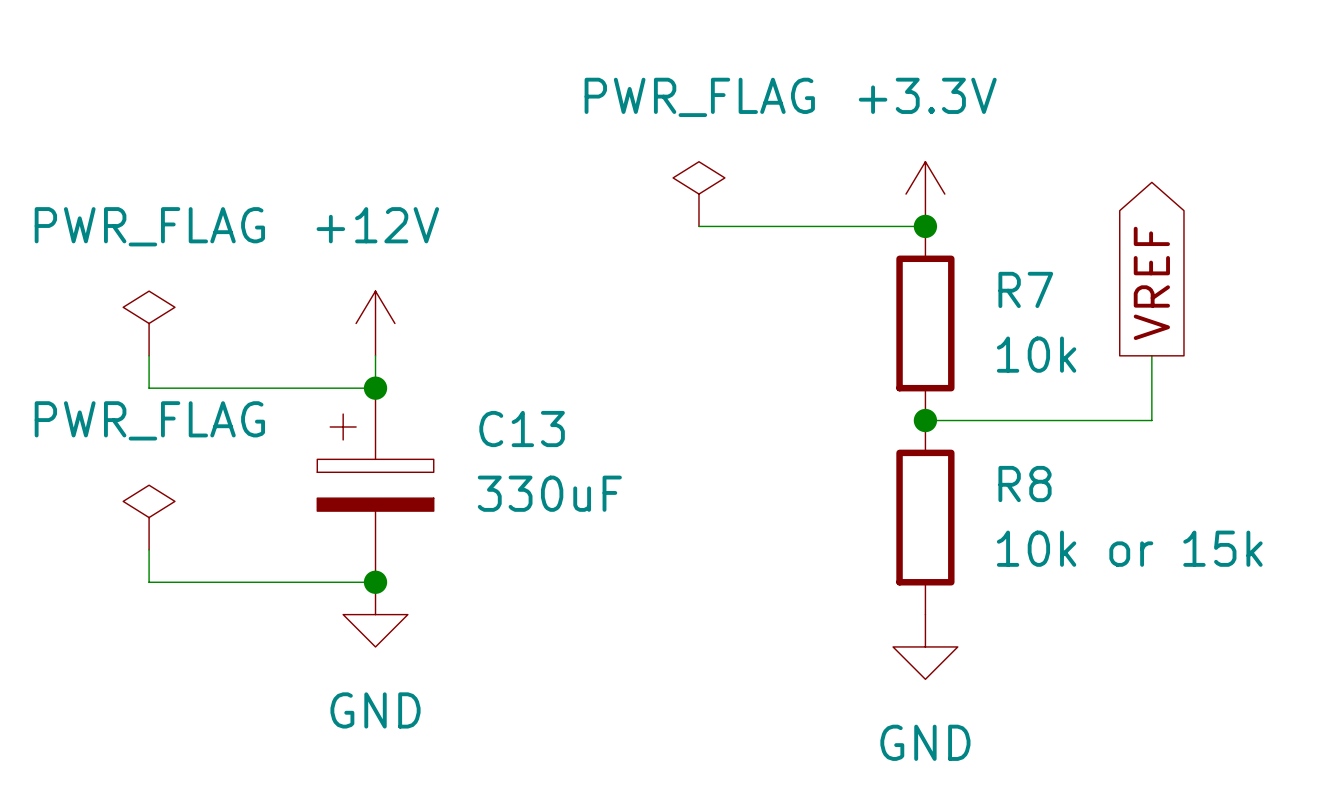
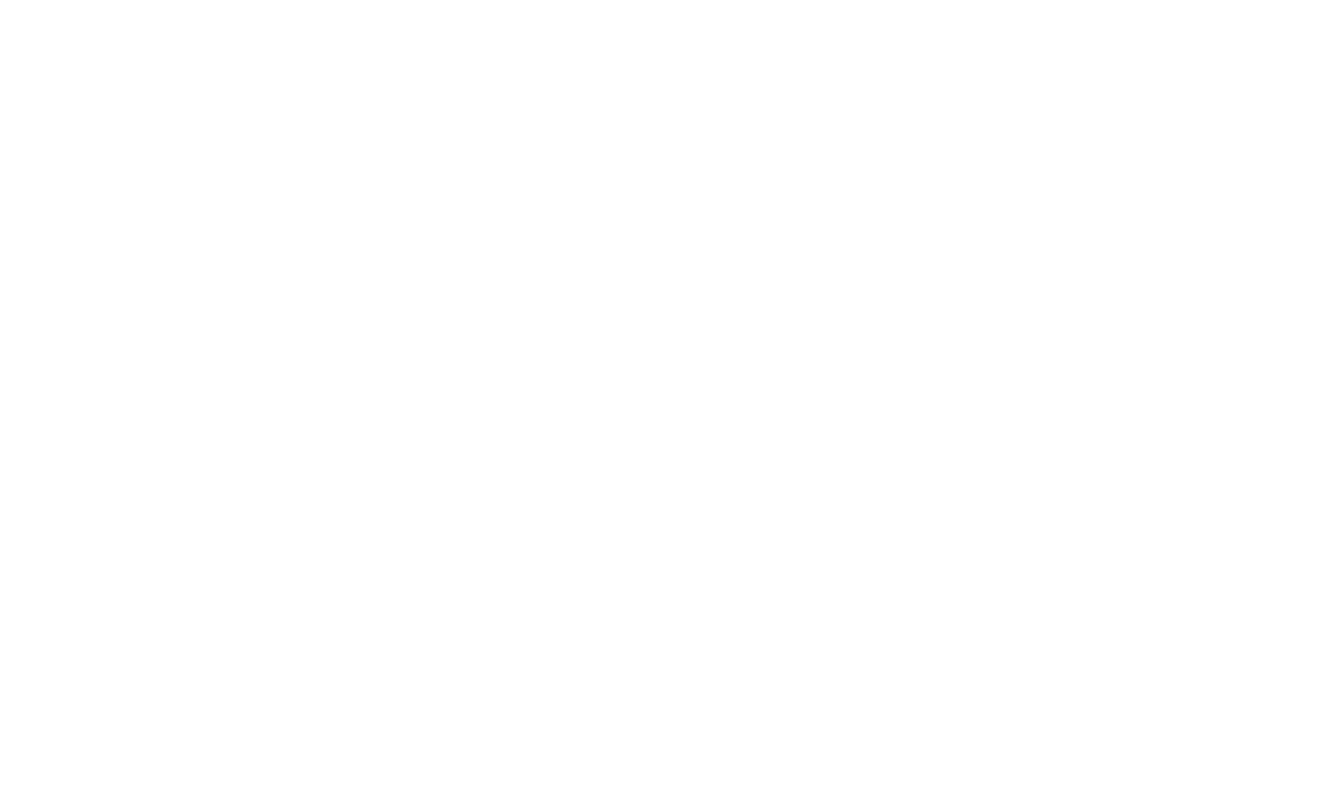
power symbol: PWR_FLAG (698, 194) -> none
power symbol: +3.3V (925, 194) -> none
wire: (698, 226) (925, 226) -> none
junction: (925, 226) -> none
global label: VREF (1151, 283) -> none
power symbol: PWR_FLAG (149, 323) -> none
power symbol: +12V (375, 323) -> none
R7: 10k (925, 323) -> none
wire: (149, 355) (149, 388) (375, 388) (375, 355) -> none
wire: (1151, 355) (1151, 420) (925, 420) -> none
junction: (375, 388) -> none
junction: (925, 420) -> none
C13: 330uF (375, 485) -> none
power symbol: PWR_FLAG (149, 517) -> none
R8: 10k or 15k (925, 517) -> none
wire: (149, 549) (149, 582) (375, 582) -> none
junction: (375, 582) -> none
power symbol: GND (375, 614) -> none
power symbol: GND (925, 646) -> none

